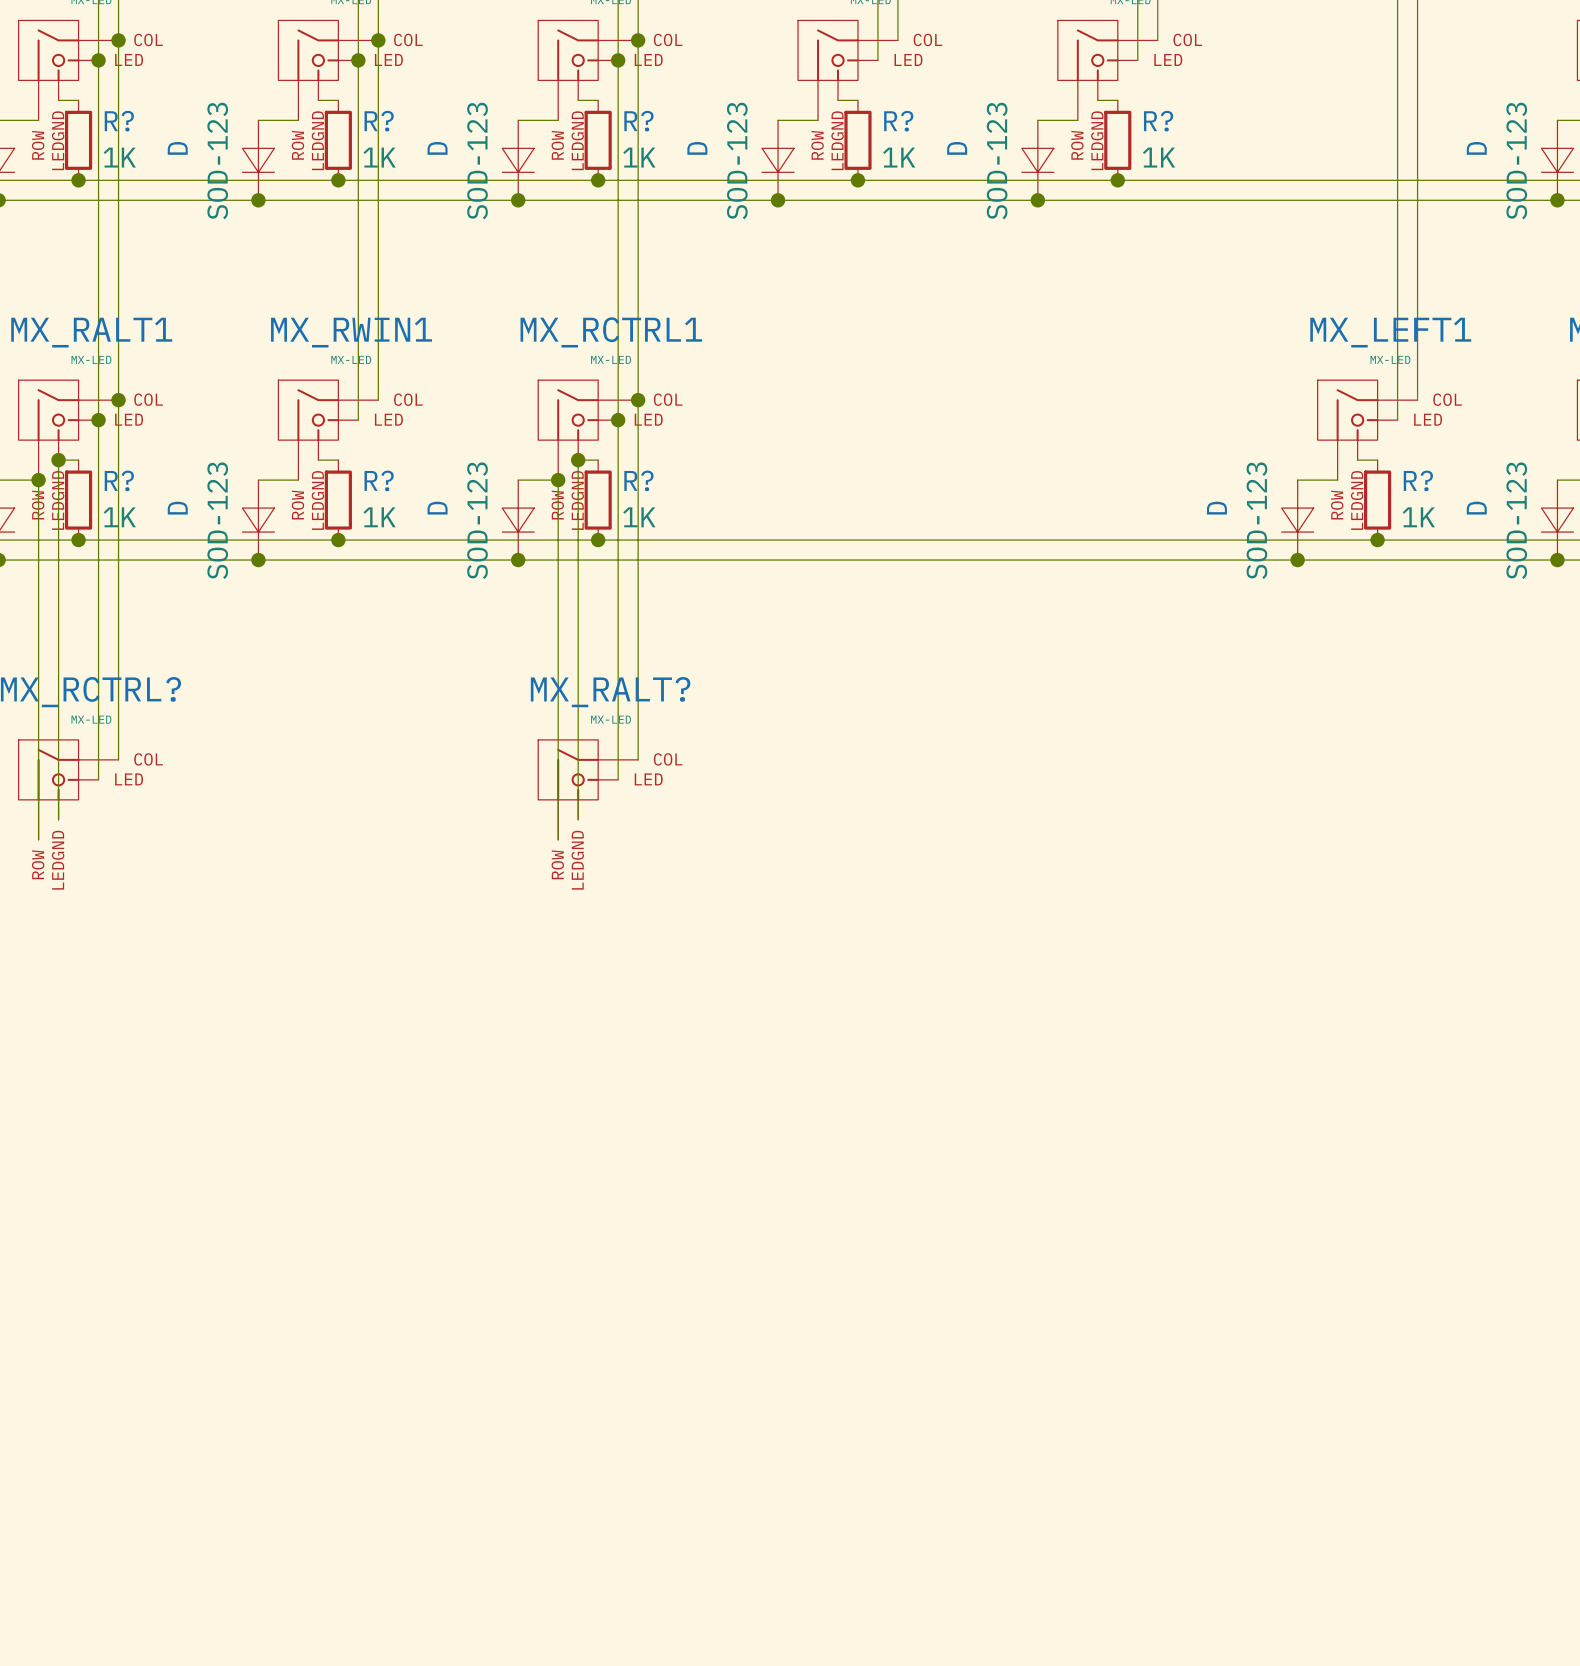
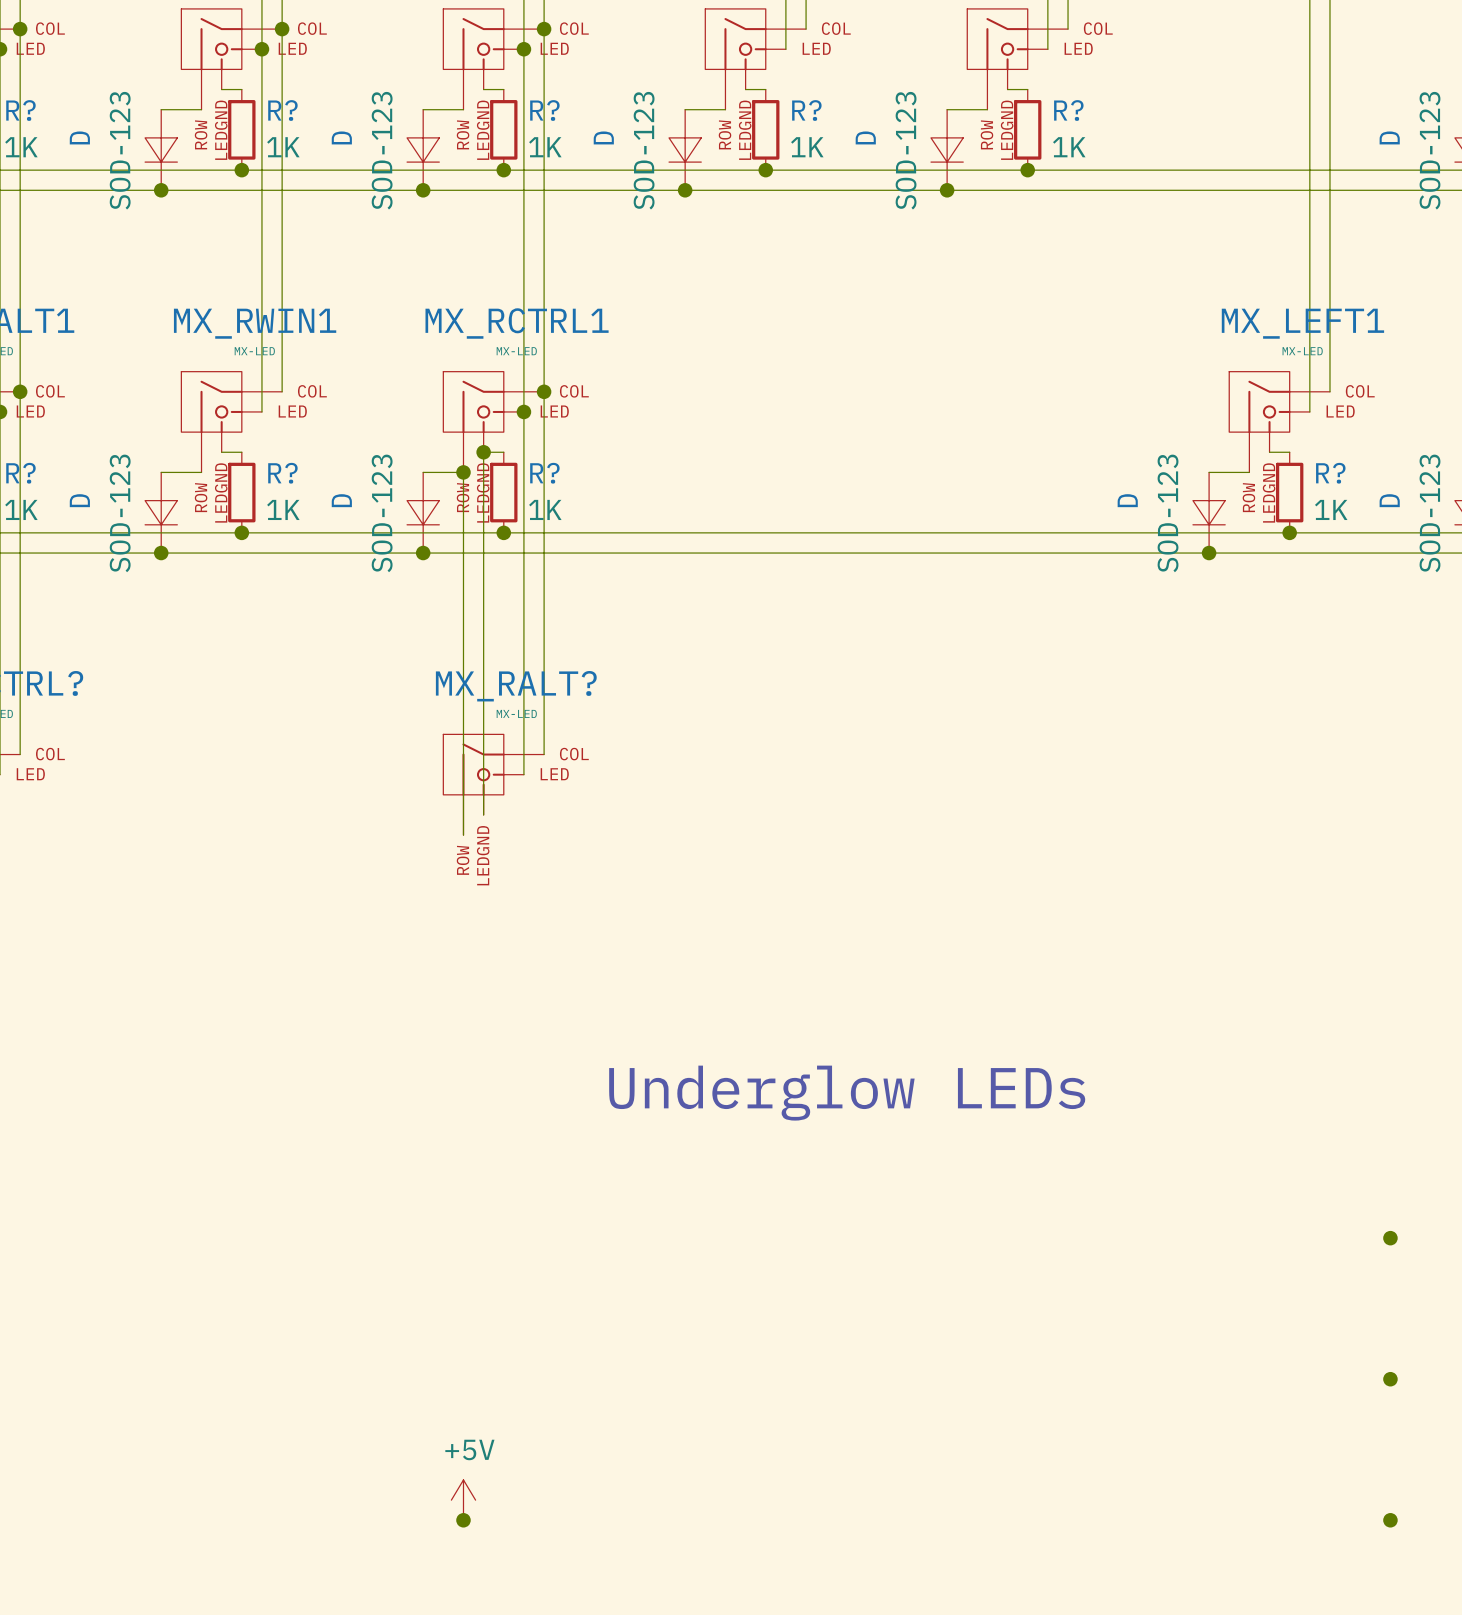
text: none -> Underglow LEDs (847, 1093)
junction: none -> (1390, 1238)
junction: none -> (1390, 1379)
power symbol: none -> +5V (463, 1500)
junction: none -> (463, 1520)
junction: none -> (1390, 1520)

